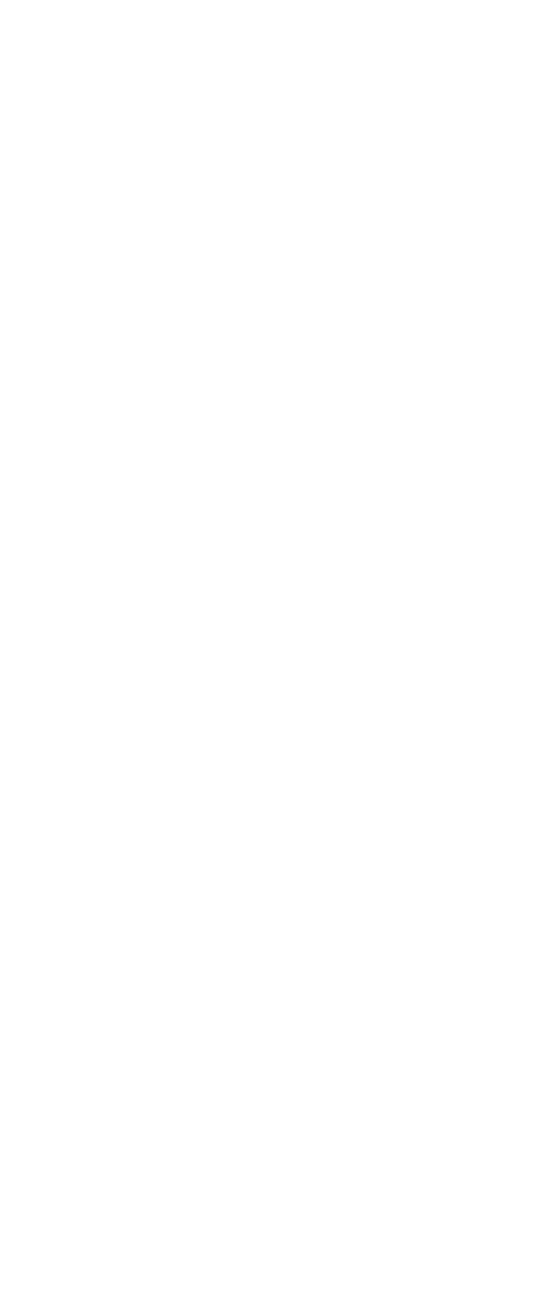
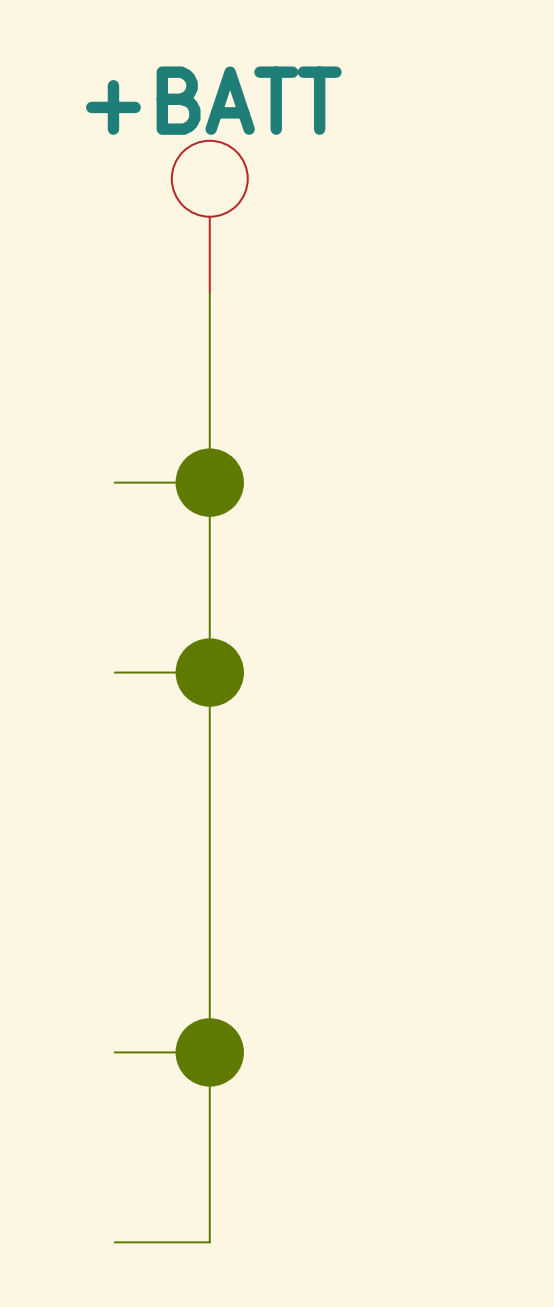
power symbol: none -> +BATT (209, 216)
wire: none -> (209, 292) (209, 1242) (114, 1242)
wire: none -> (114, 482) (209, 482)
junction: none -> (209, 482)
wire: none -> (114, 672) (209, 672)
junction: none -> (209, 672)
wire: none -> (114, 1052) (209, 1052)
junction: none -> (209, 1052)

